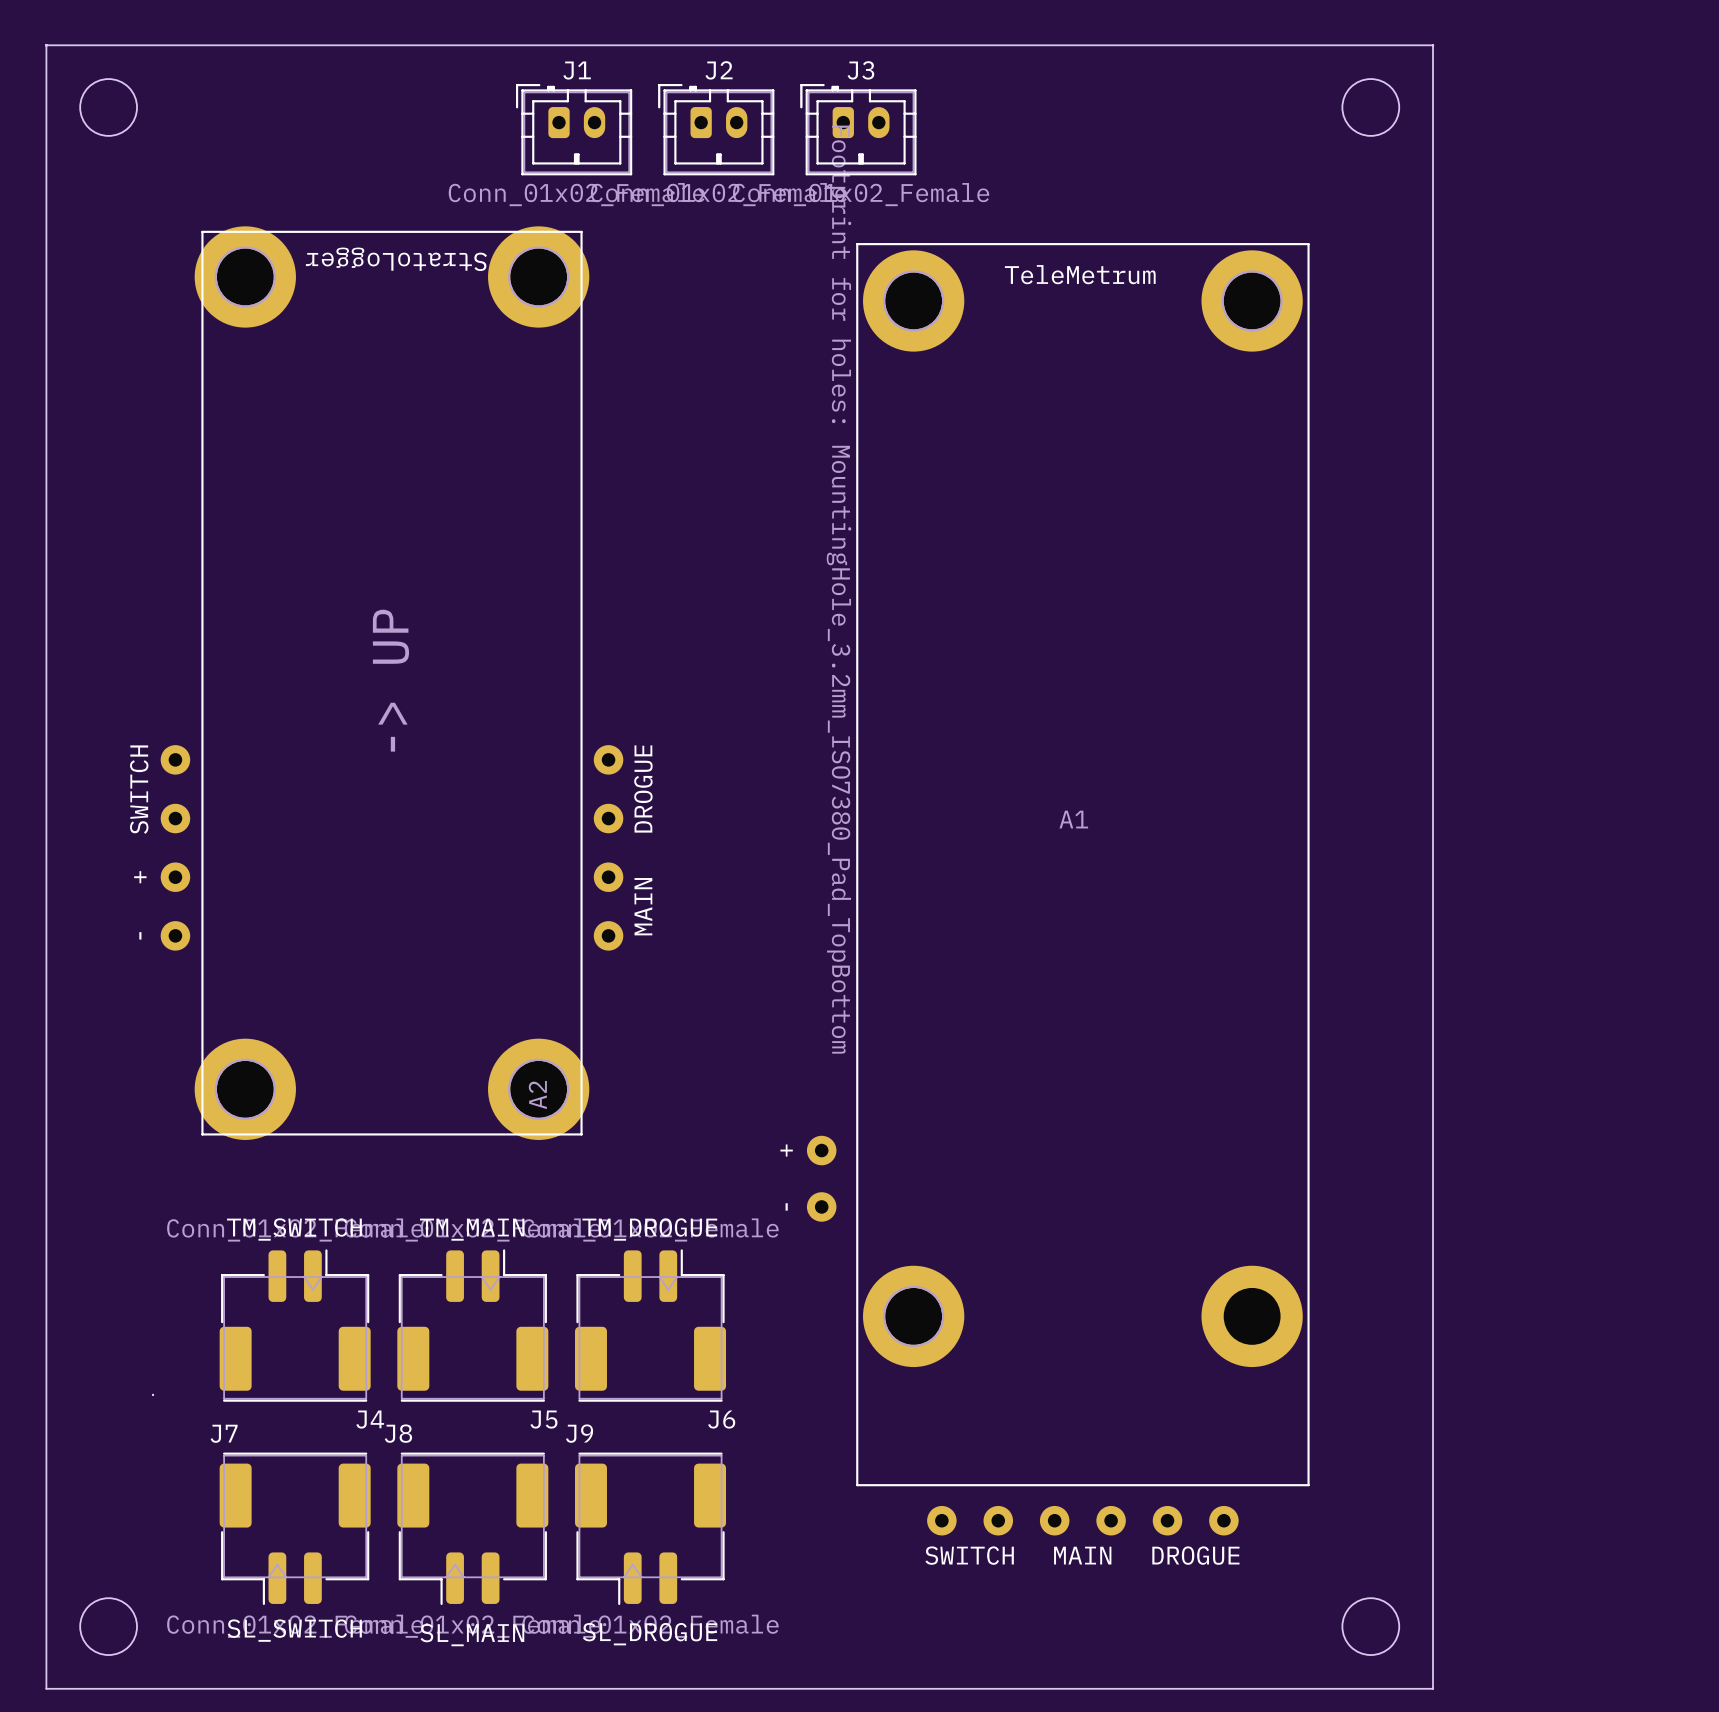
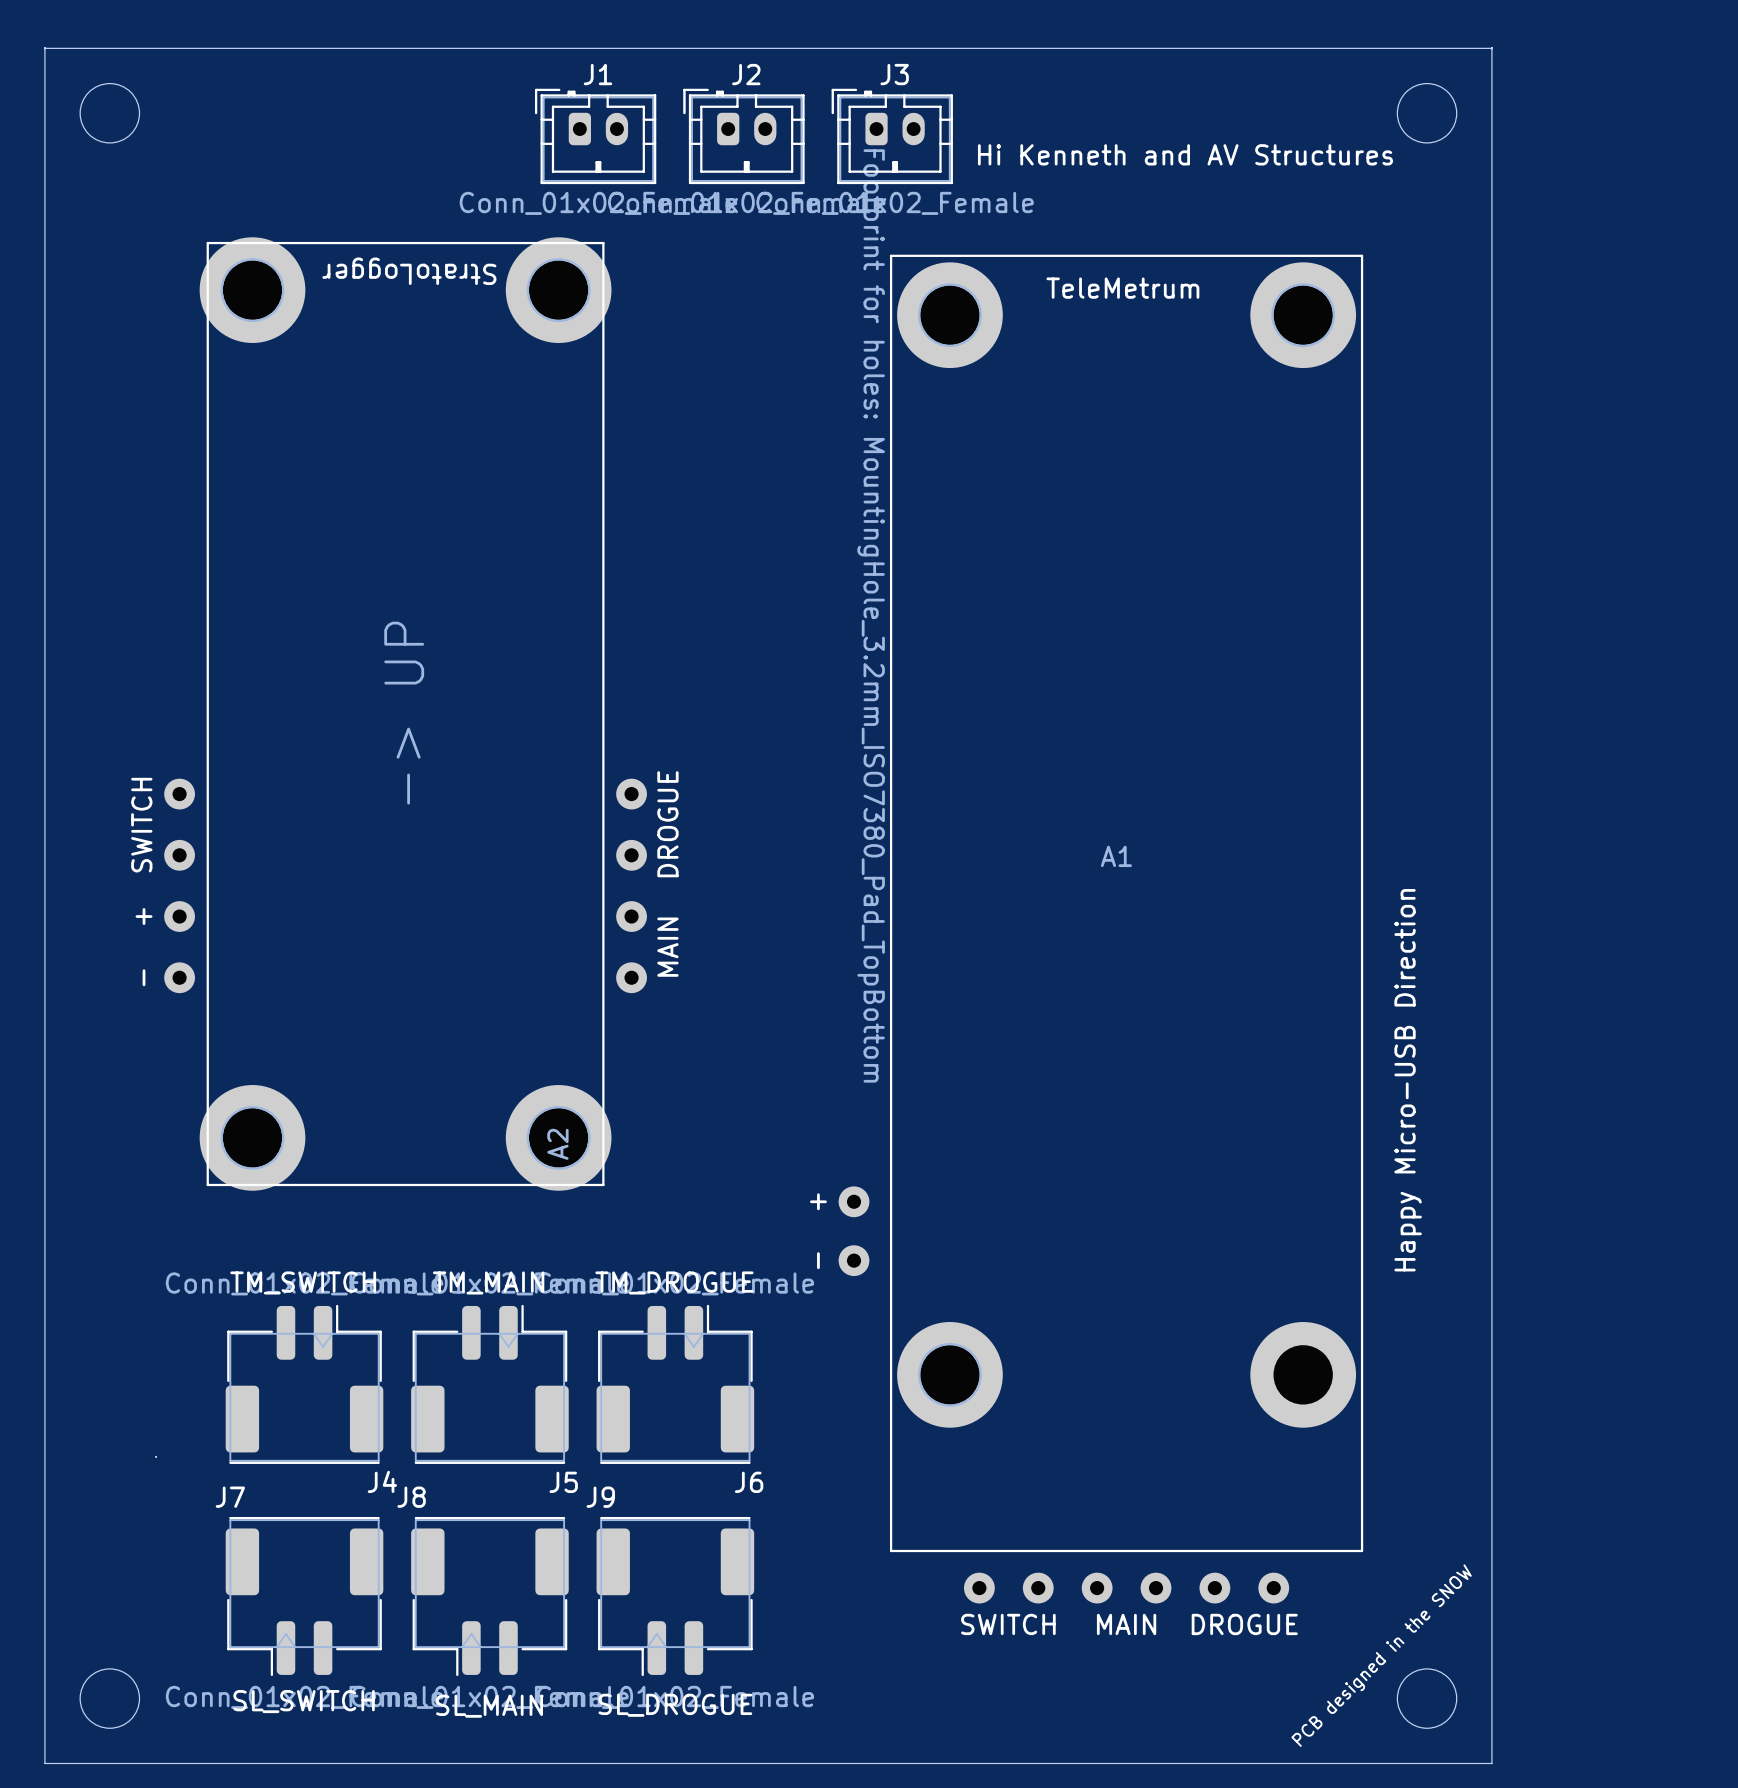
text: none -> Hi Kenneth and AV Structures (1185, 154)
text: none -> Happy Micro-USB Direction (1408, 1080)
text: none -> PCB designed in the SNOW (1381, 1655)

